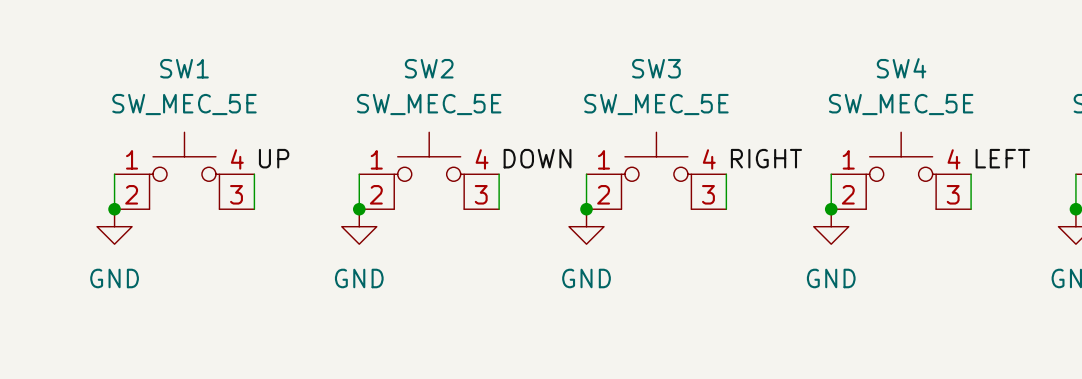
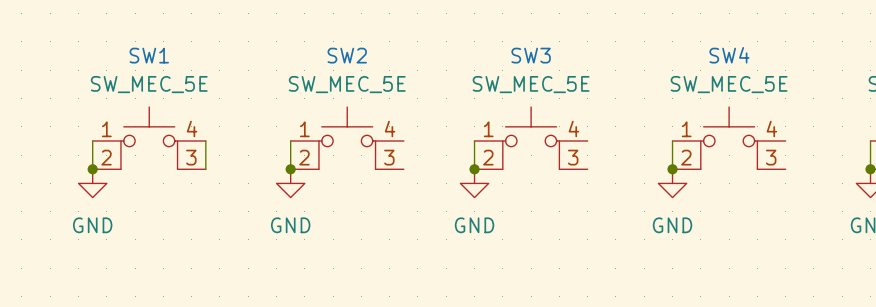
label: UP (274, 158) -> none
label: DOWN (537, 158) -> none
label: RIGHT (766, 158) -> none
label: LEFT (1002, 158) -> none
wire: (499, 174) (499, 209) -> none
wire: (726, 174) (726, 209) -> none
wire: (971, 174) (971, 209) -> none

